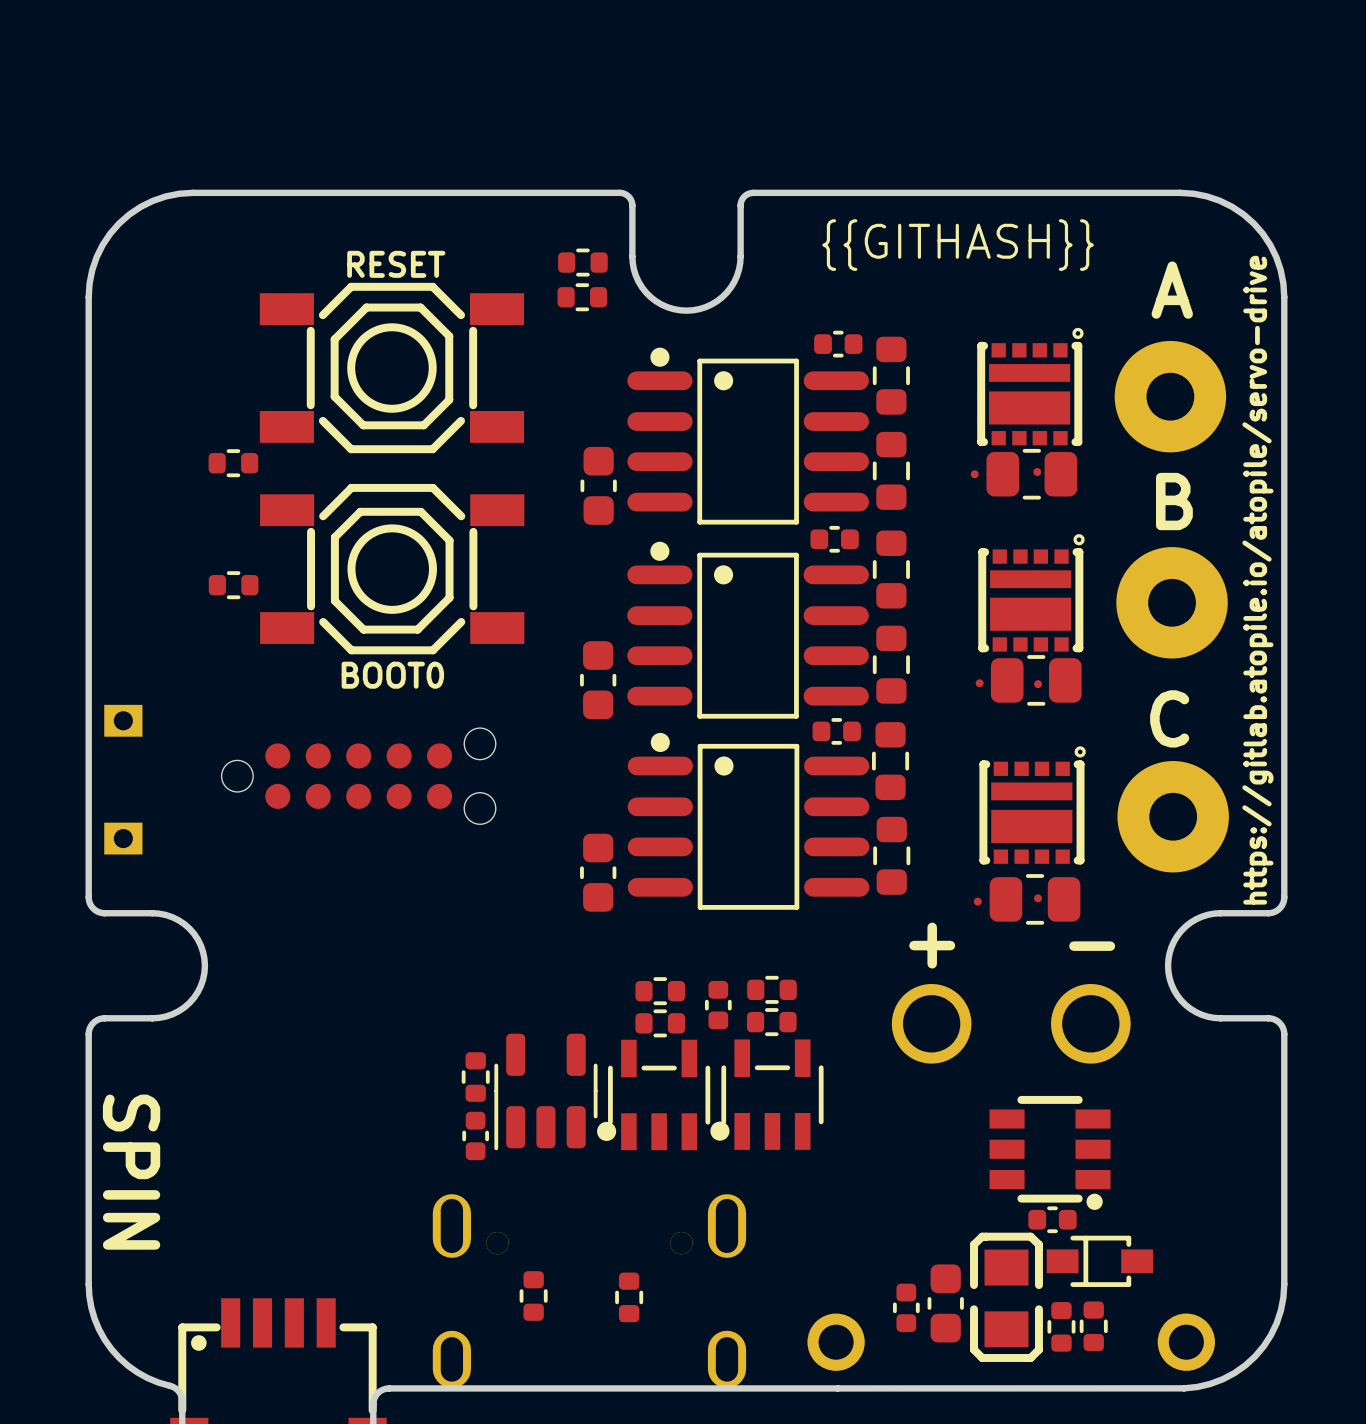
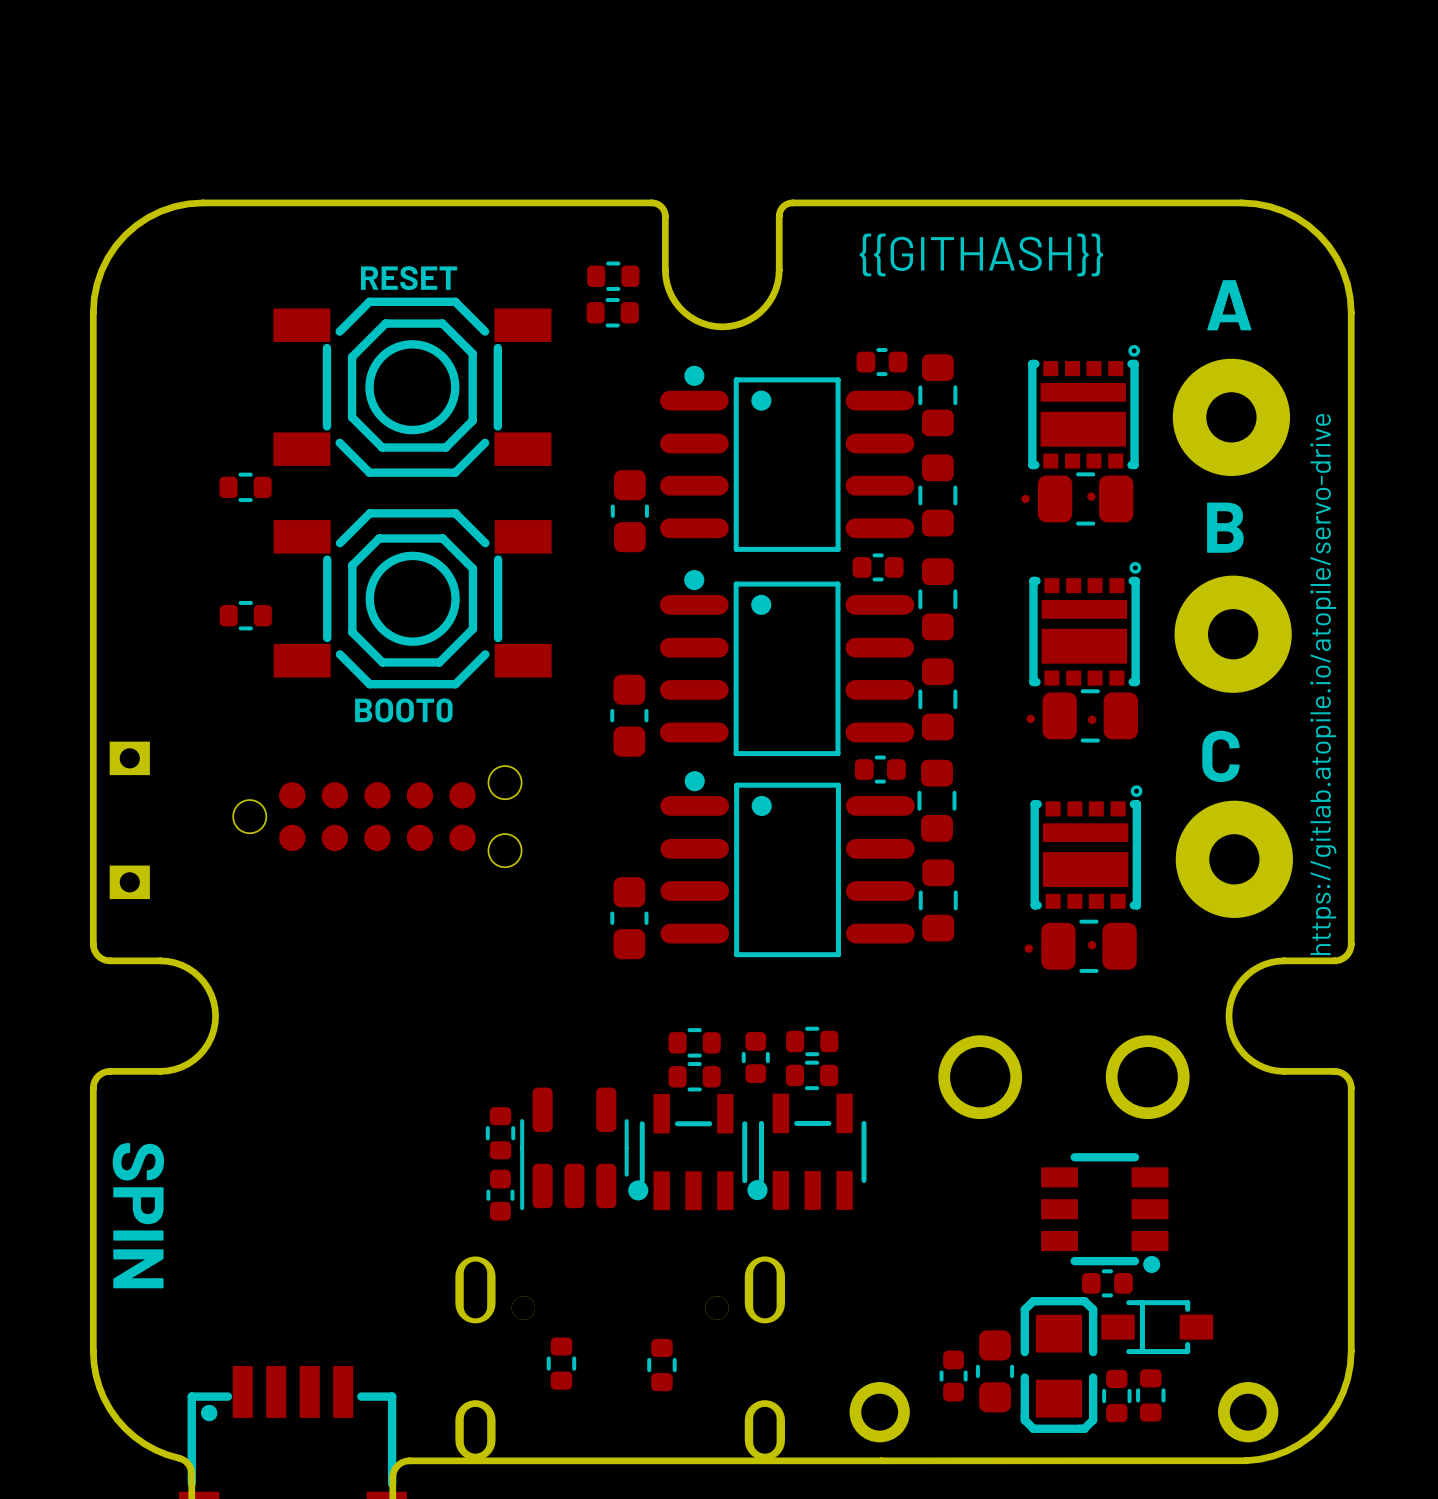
text: + (932, 945) -> none
text: - (1092, 946) -> none

